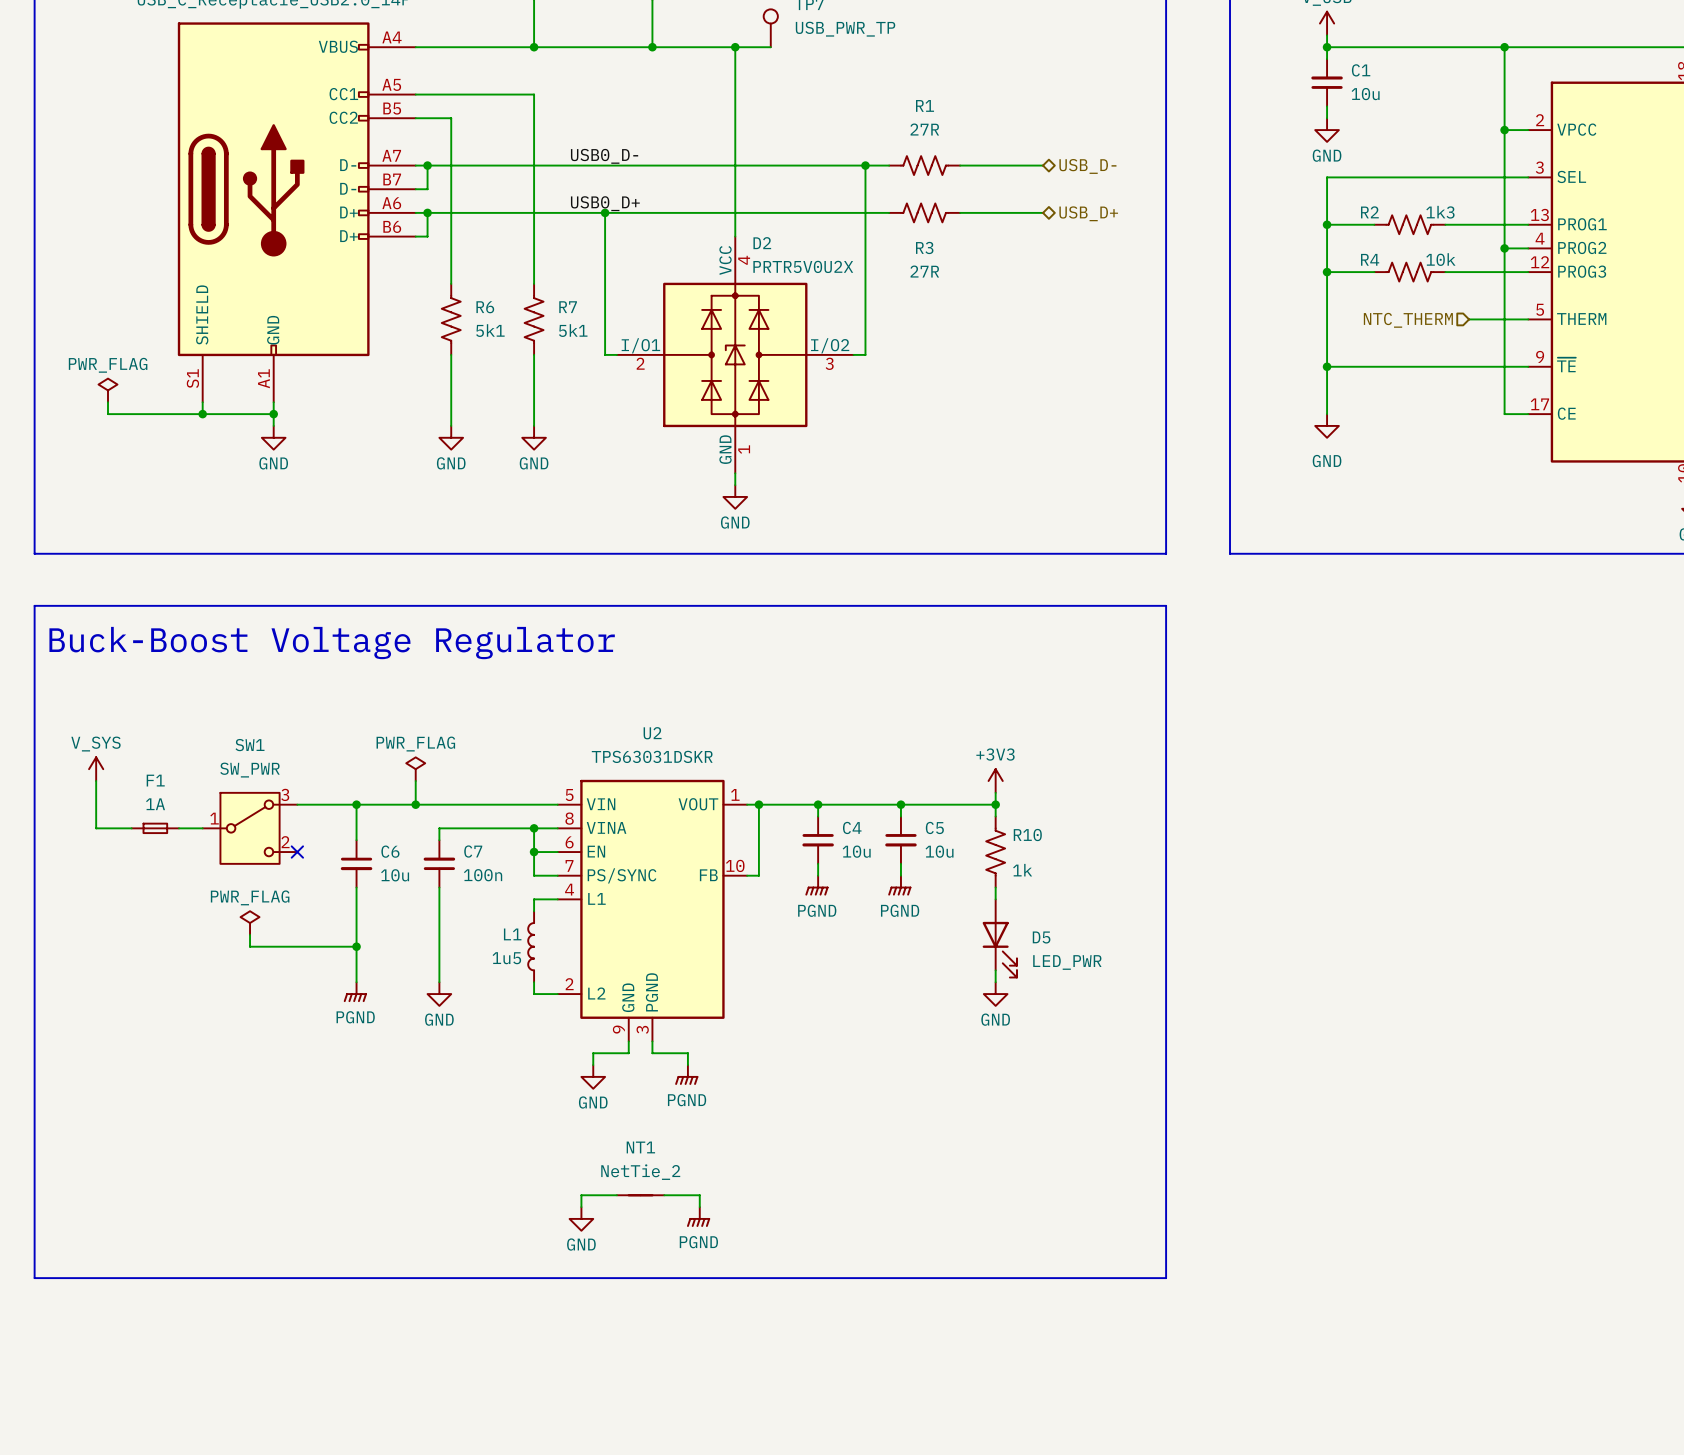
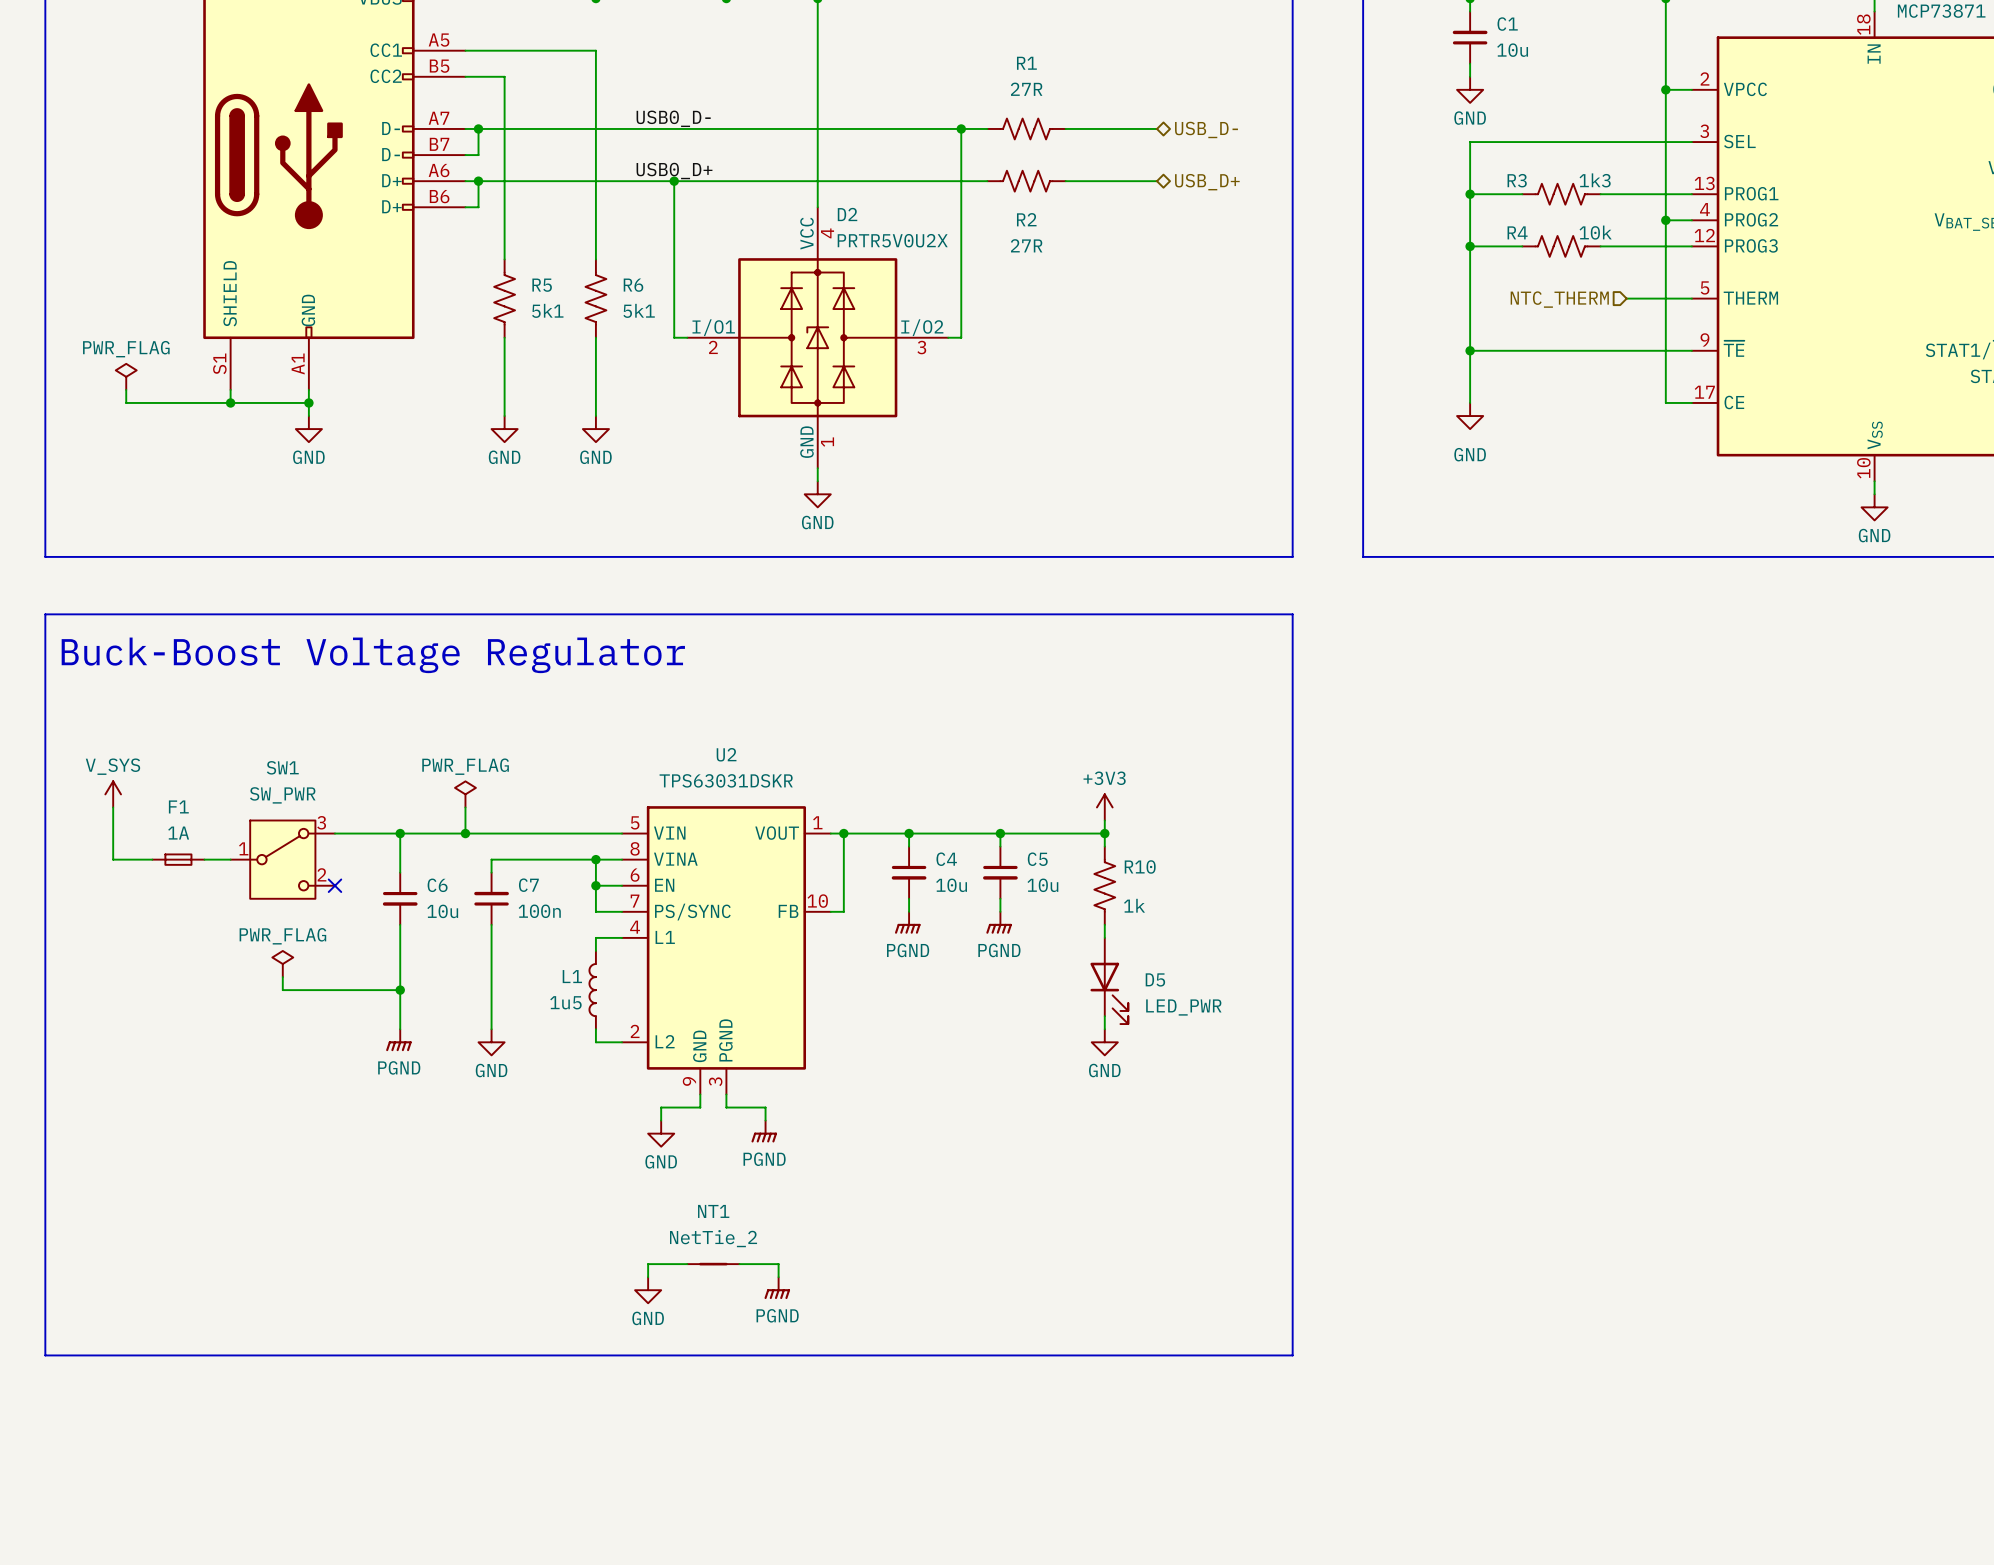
R2 name: R2 (1369, 212) -> R3 (1517, 180)
R3 name: R3 (924, 247) -> R2 (1026, 219)
R6 name: R6 (485, 307) -> R5 (542, 285)
R7 name: R7 (568, 307) -> R6 (633, 285)

